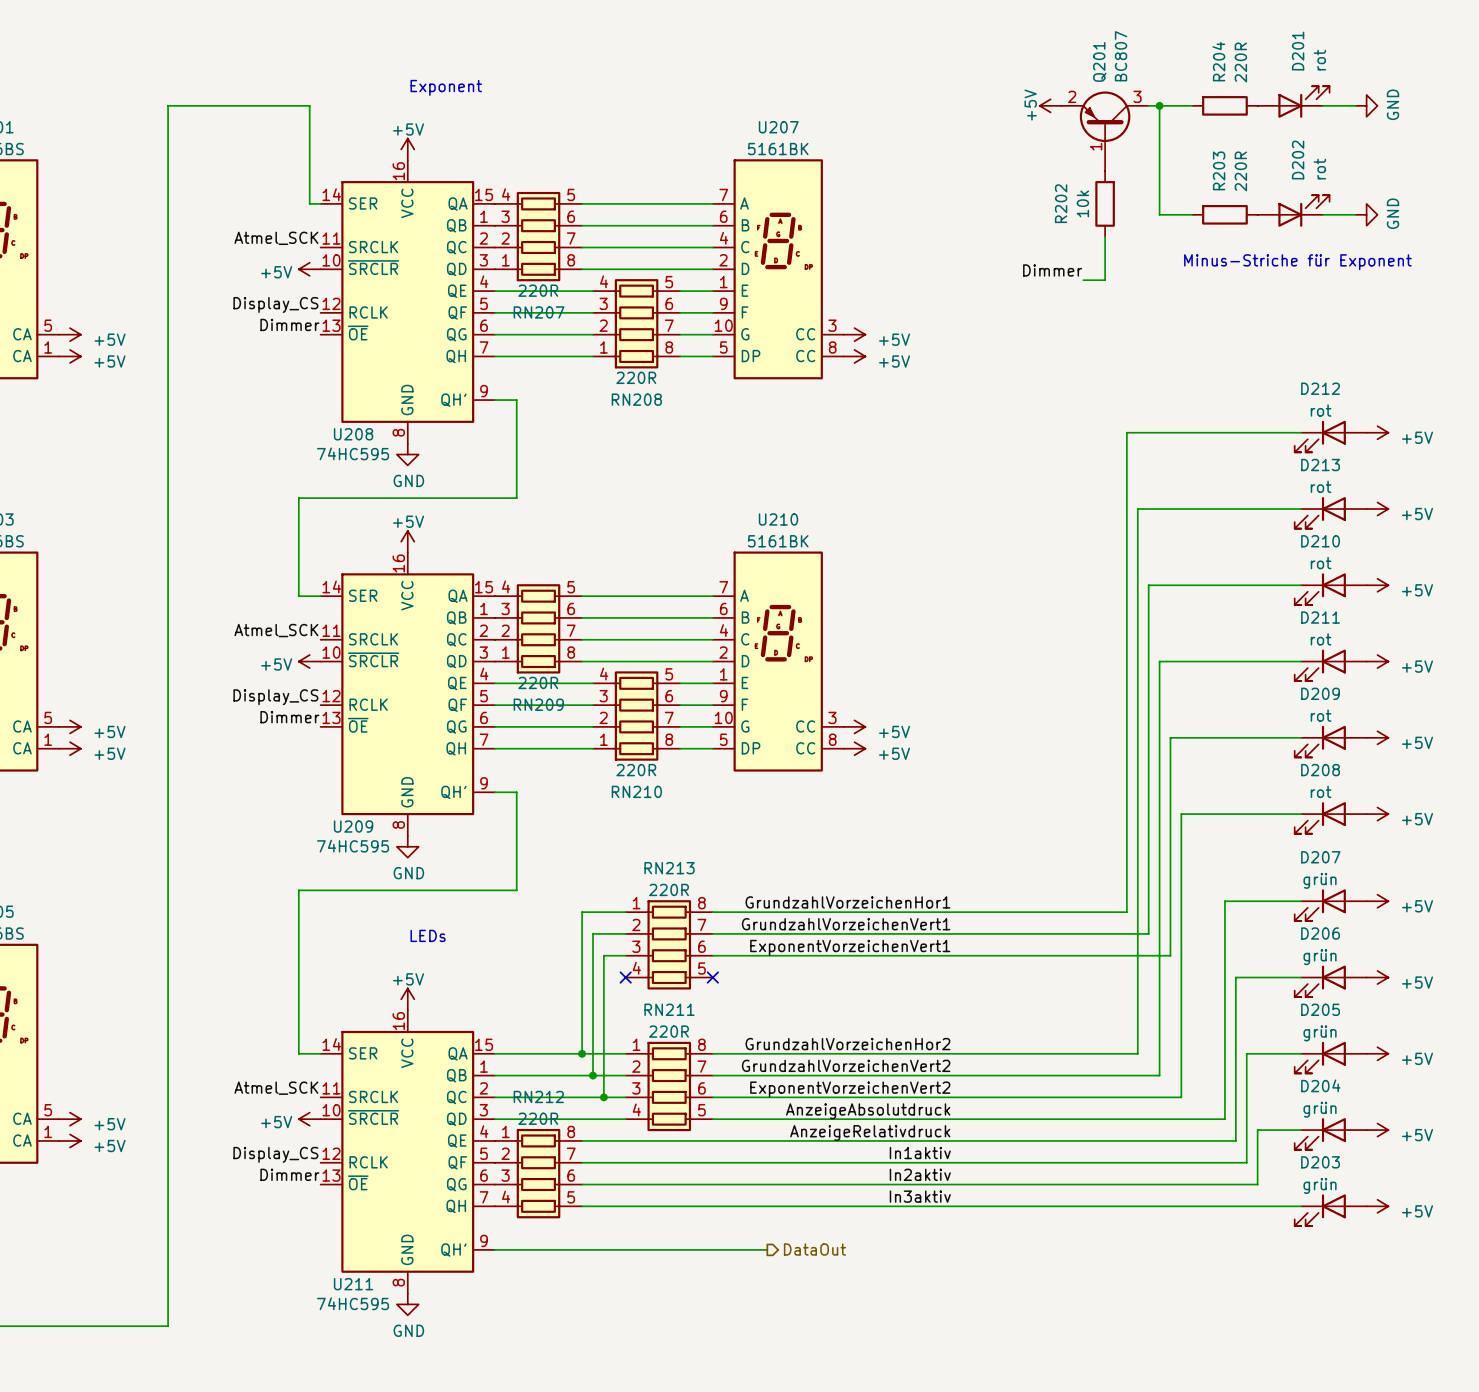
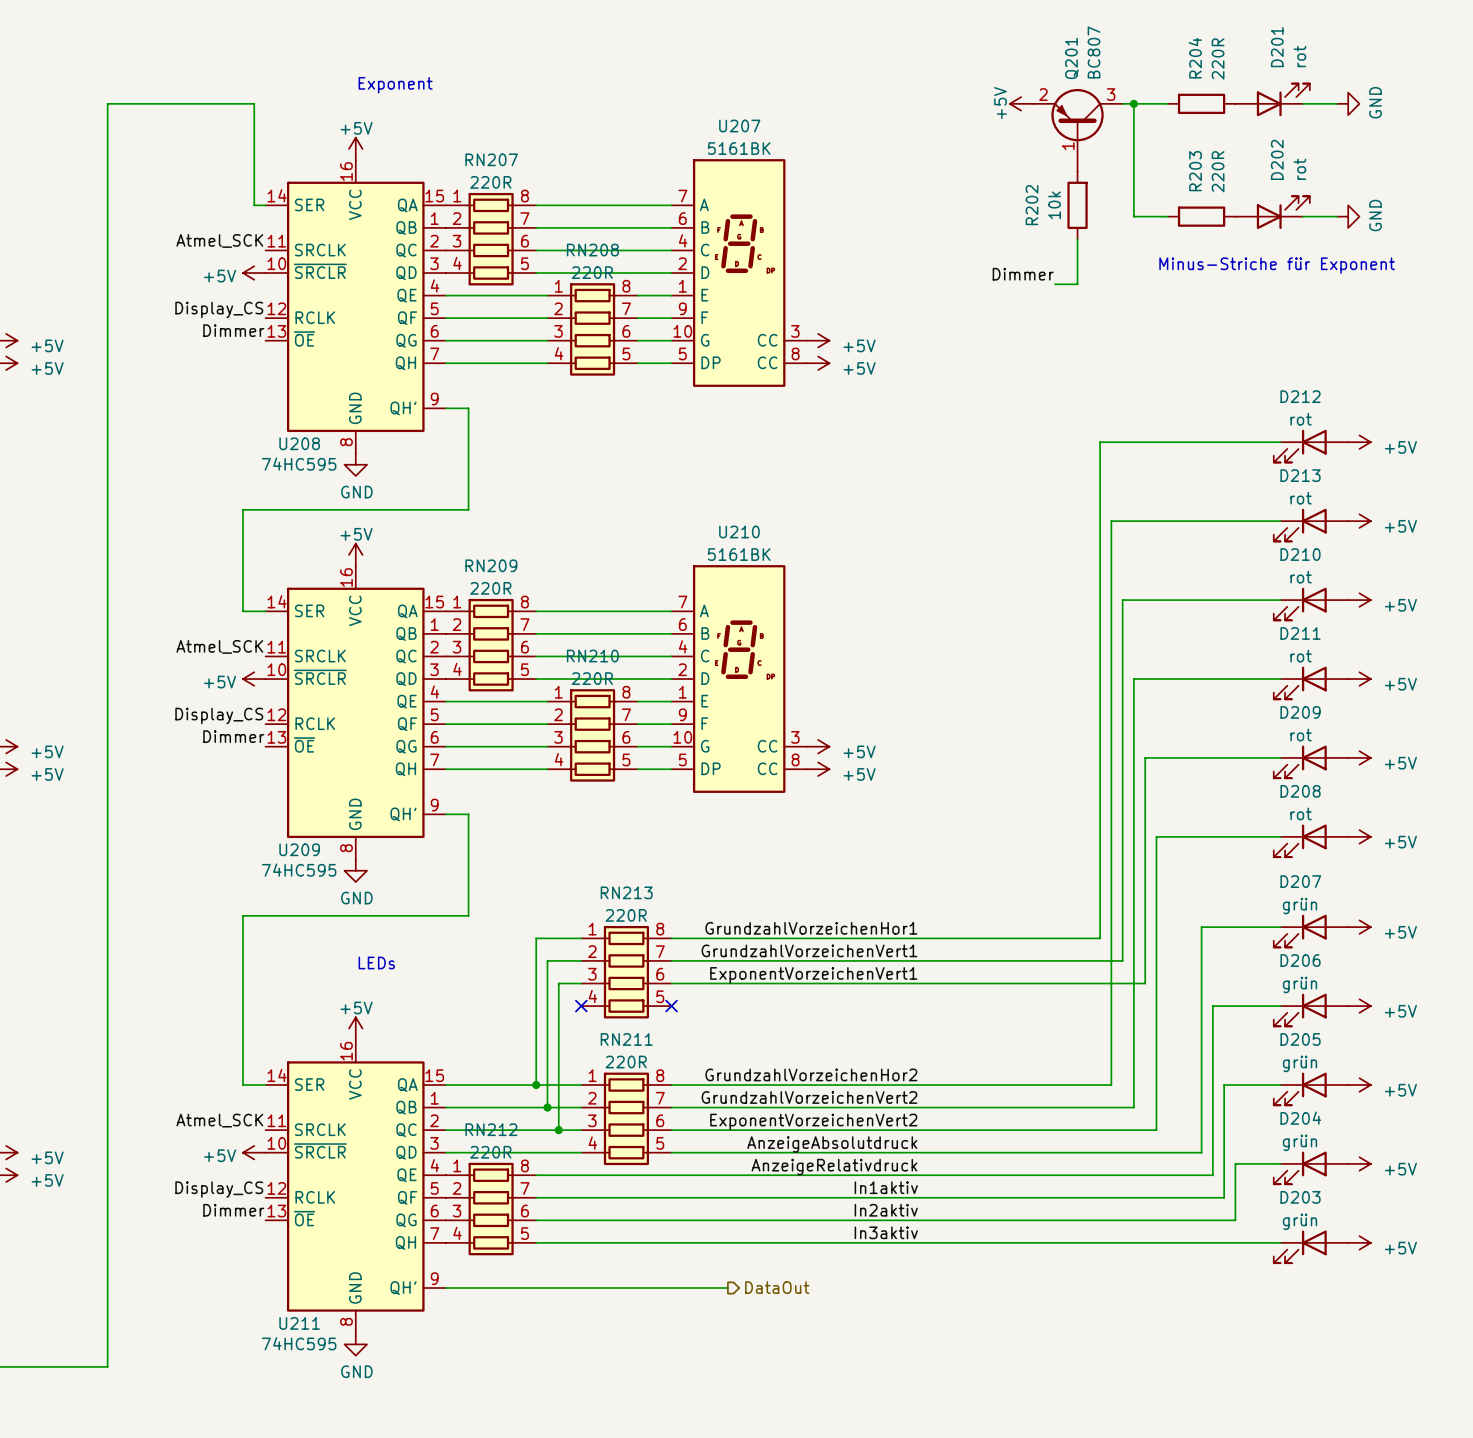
RN207 flip: as is (538, 236) -> up-down (491, 239)
RN208 flip: as is (636, 323) -> up-down (592, 329)
RN209 flip: as is (538, 628) -> up-down (491, 645)
RN210 flip: as is (636, 716) -> up-down (592, 735)

